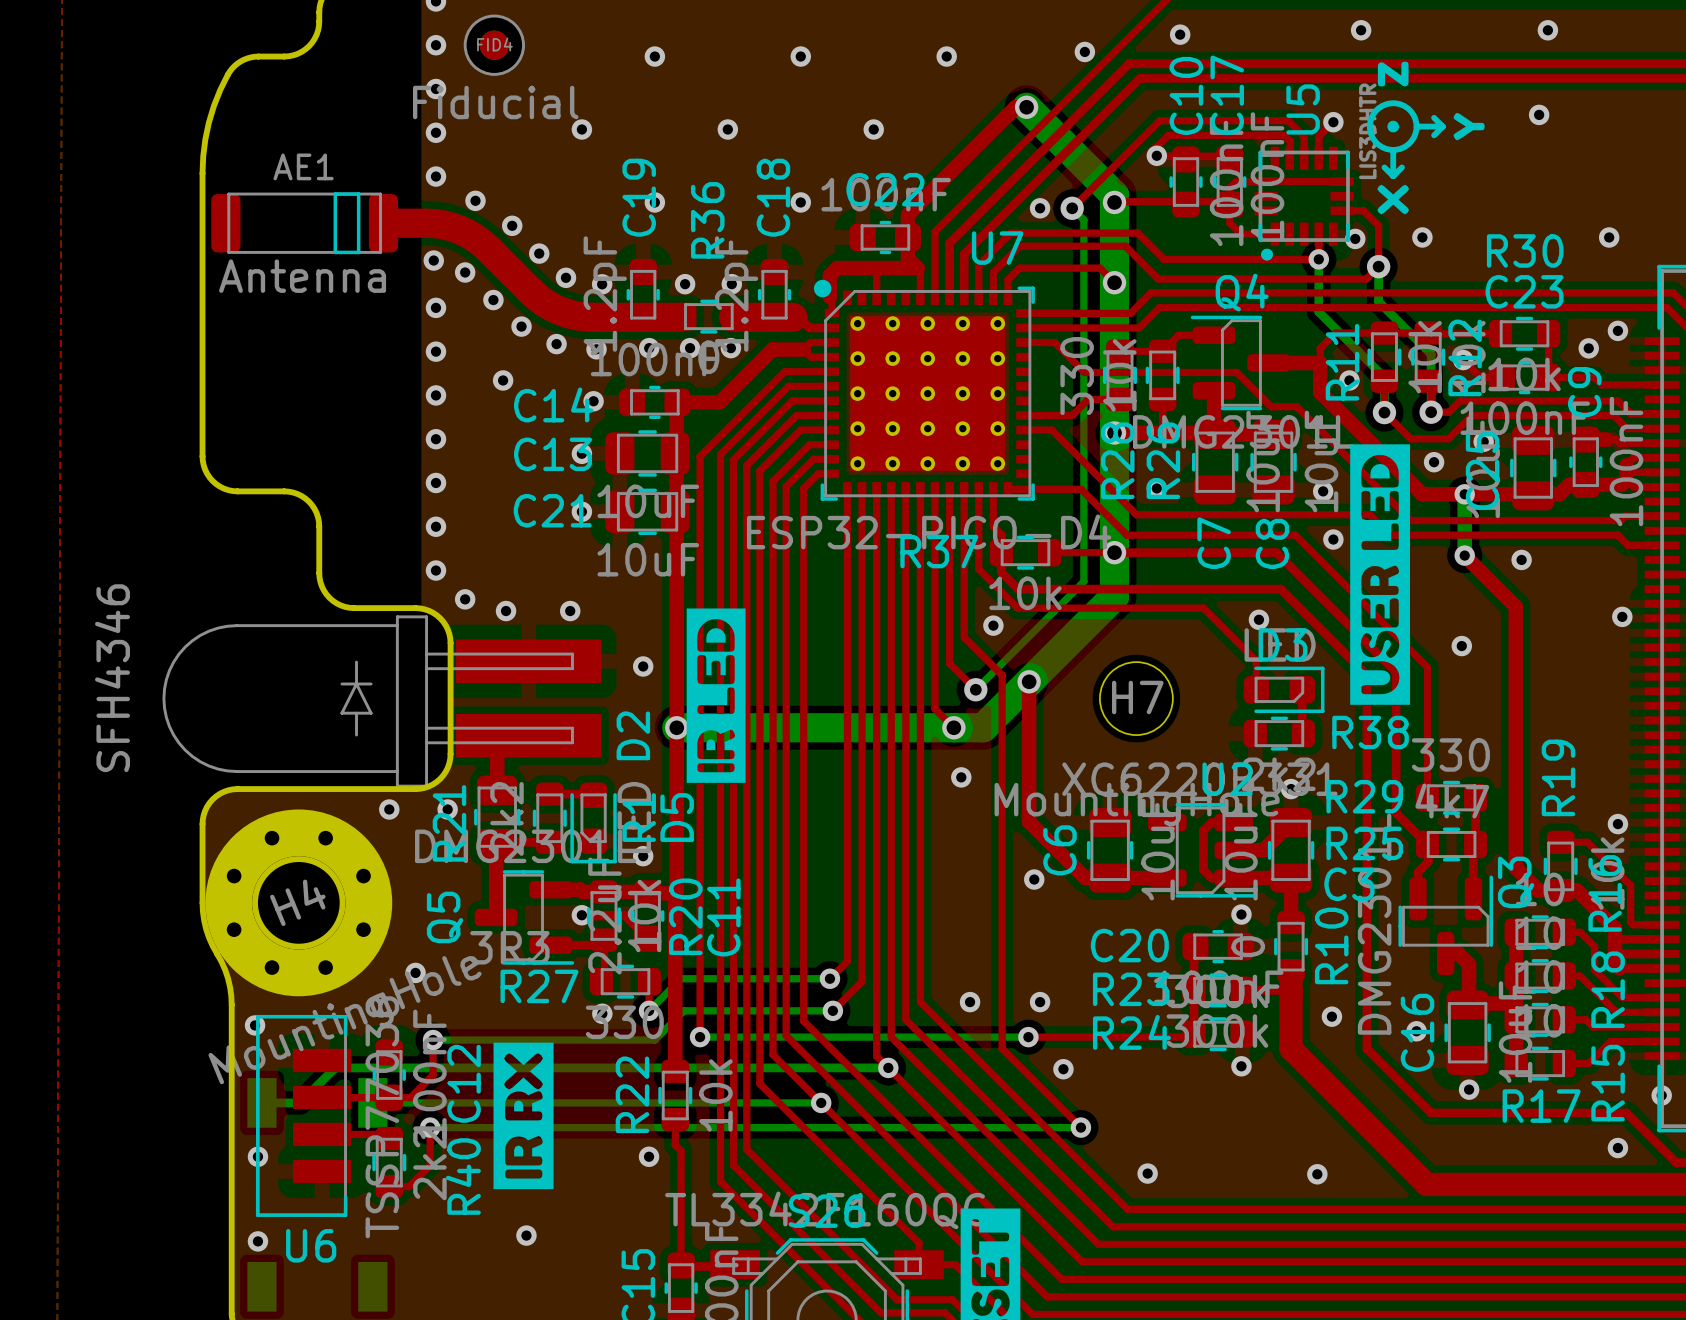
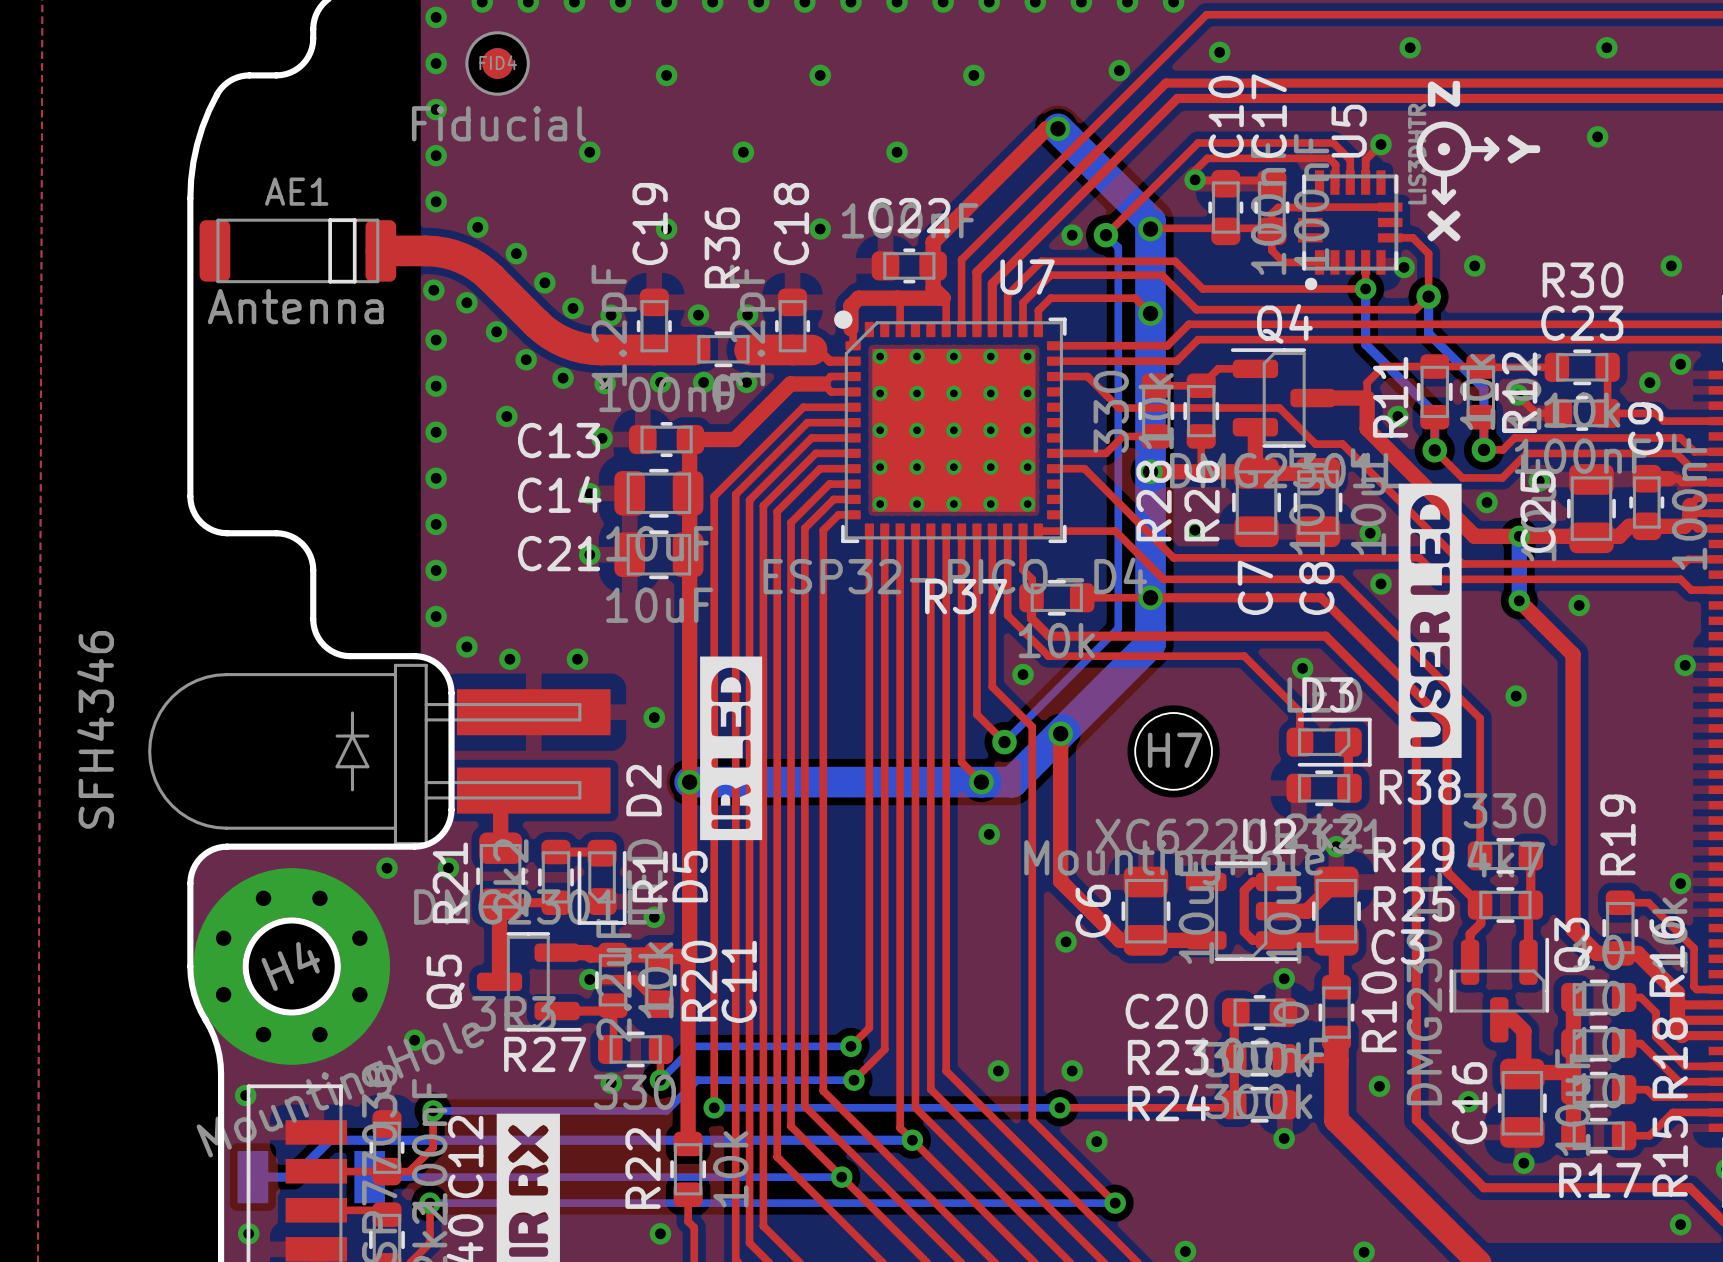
C14 name position: C14 (553, 404) -> C14 (559, 494)
C13 name position: C13 (553, 454) -> C13 (559, 440)

